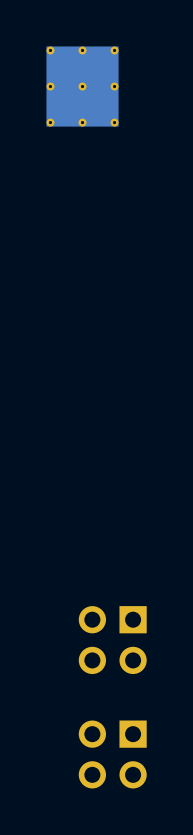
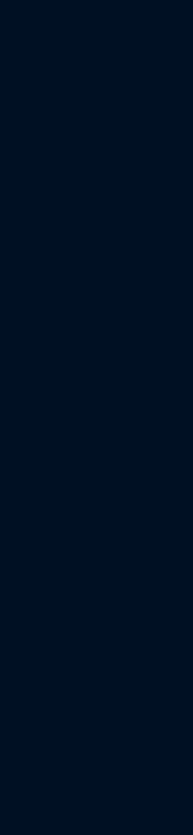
part: (82, 86) -> none
part: (112, 640) -> none
part: (112, 754) -> none

